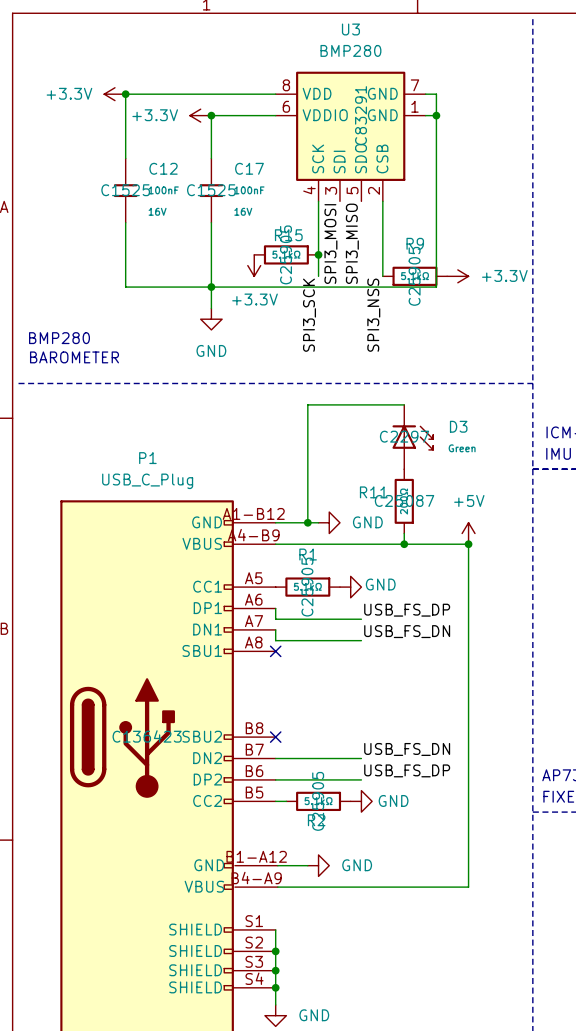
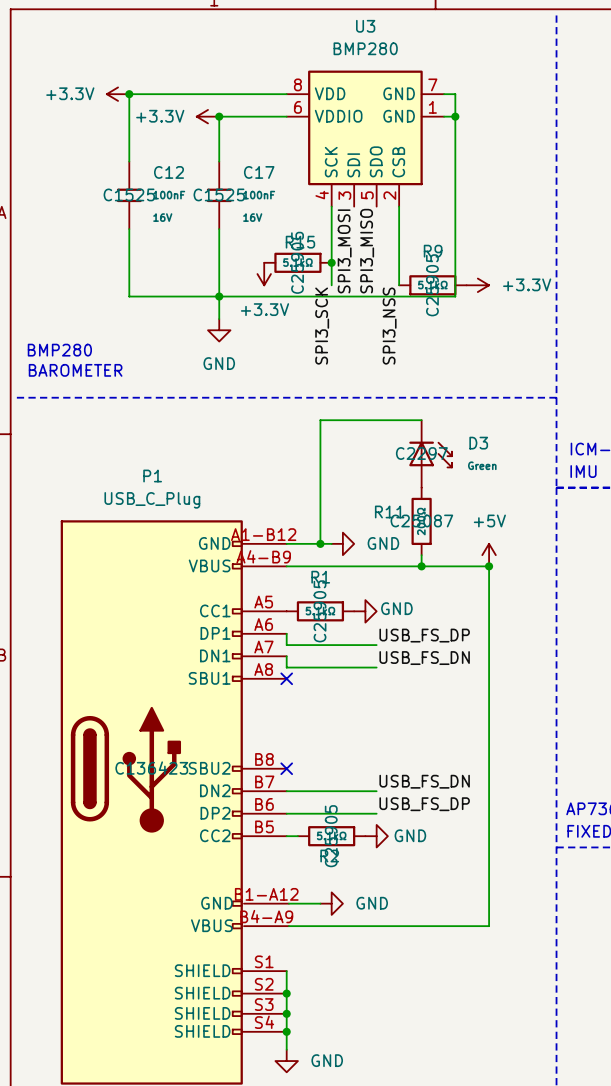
U3 text: C83291 (361, 115) -> none

